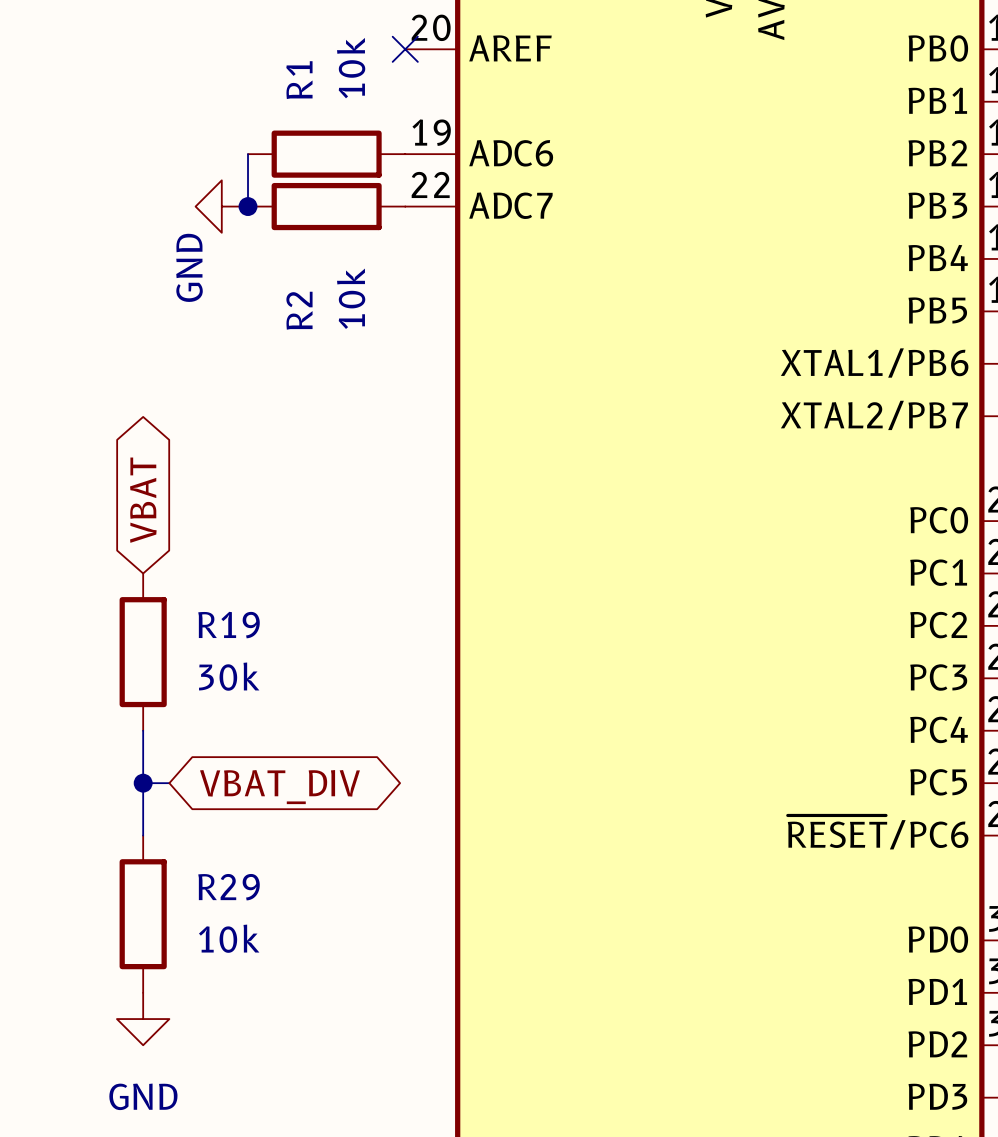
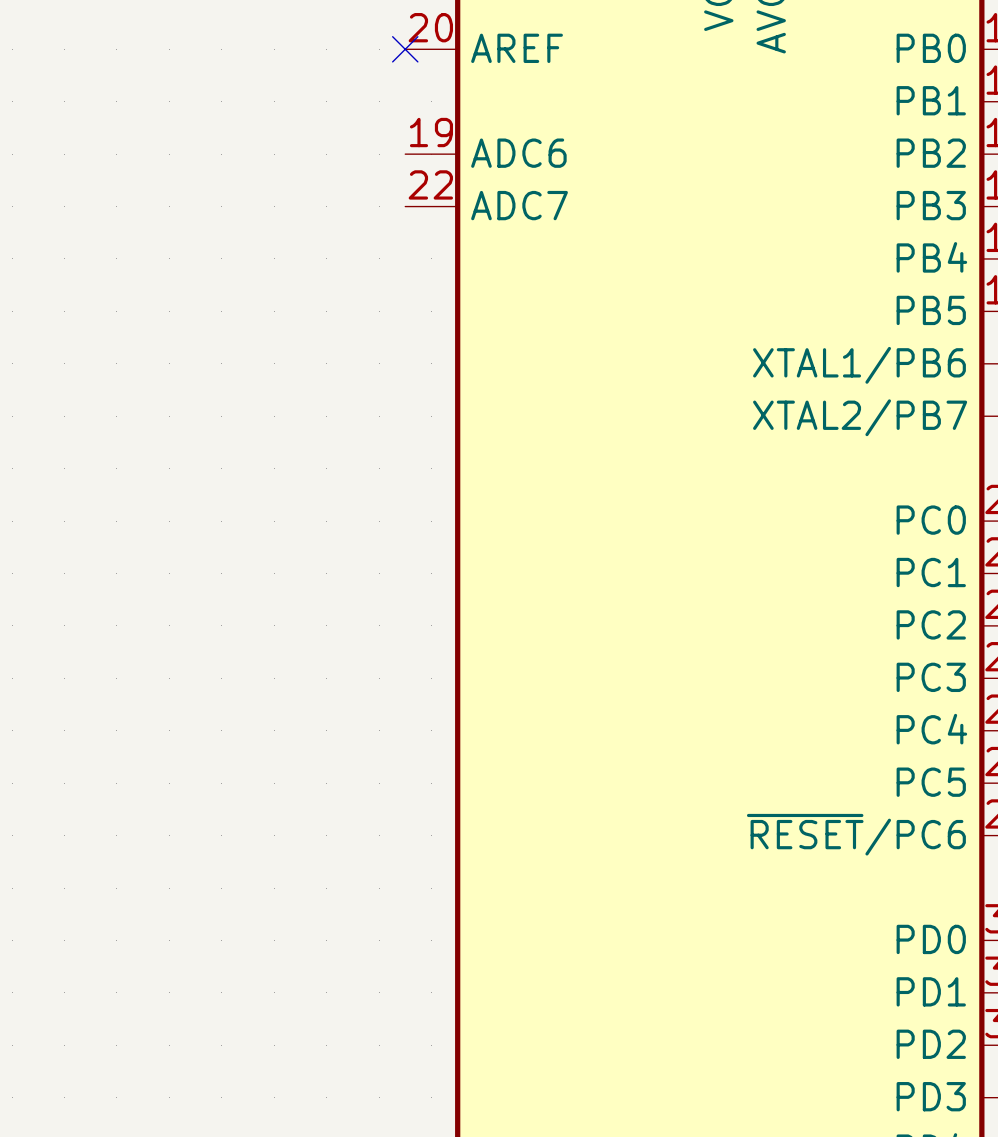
wire: (248, 154) (248, 206) -> none
R1: 10k (326, 154) -> none
power symbol: GND (221, 206) -> none
junction: (248, 206) -> none
R2: 10k (326, 206) -> none
global label: VBAT (143, 500) -> none
R19: 30k (143, 652) -> none
wire: (143, 730) (143, 835) -> none
wire: (143, 783) (169, 783) -> none
junction: (143, 783) -> none
global label: VBAT_DIV (279, 787) -> none
R29: 10k (143, 914) -> none
power symbol: GND (143, 1019) -> none

